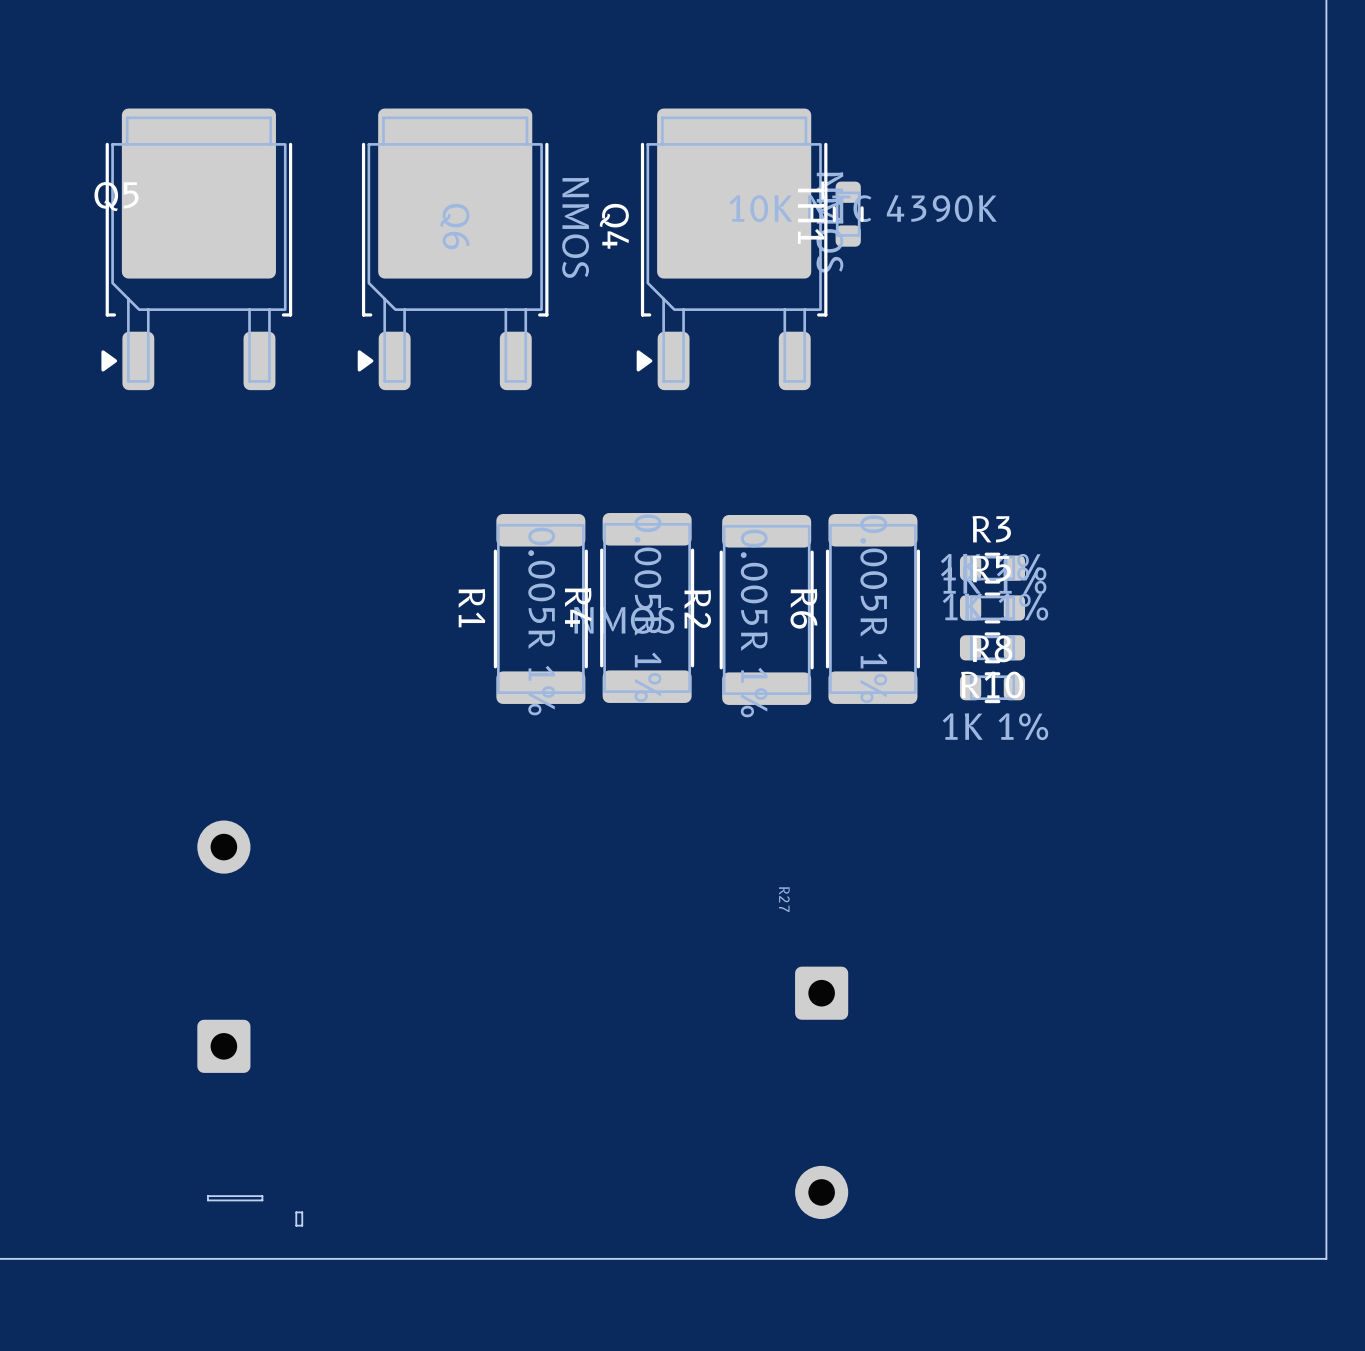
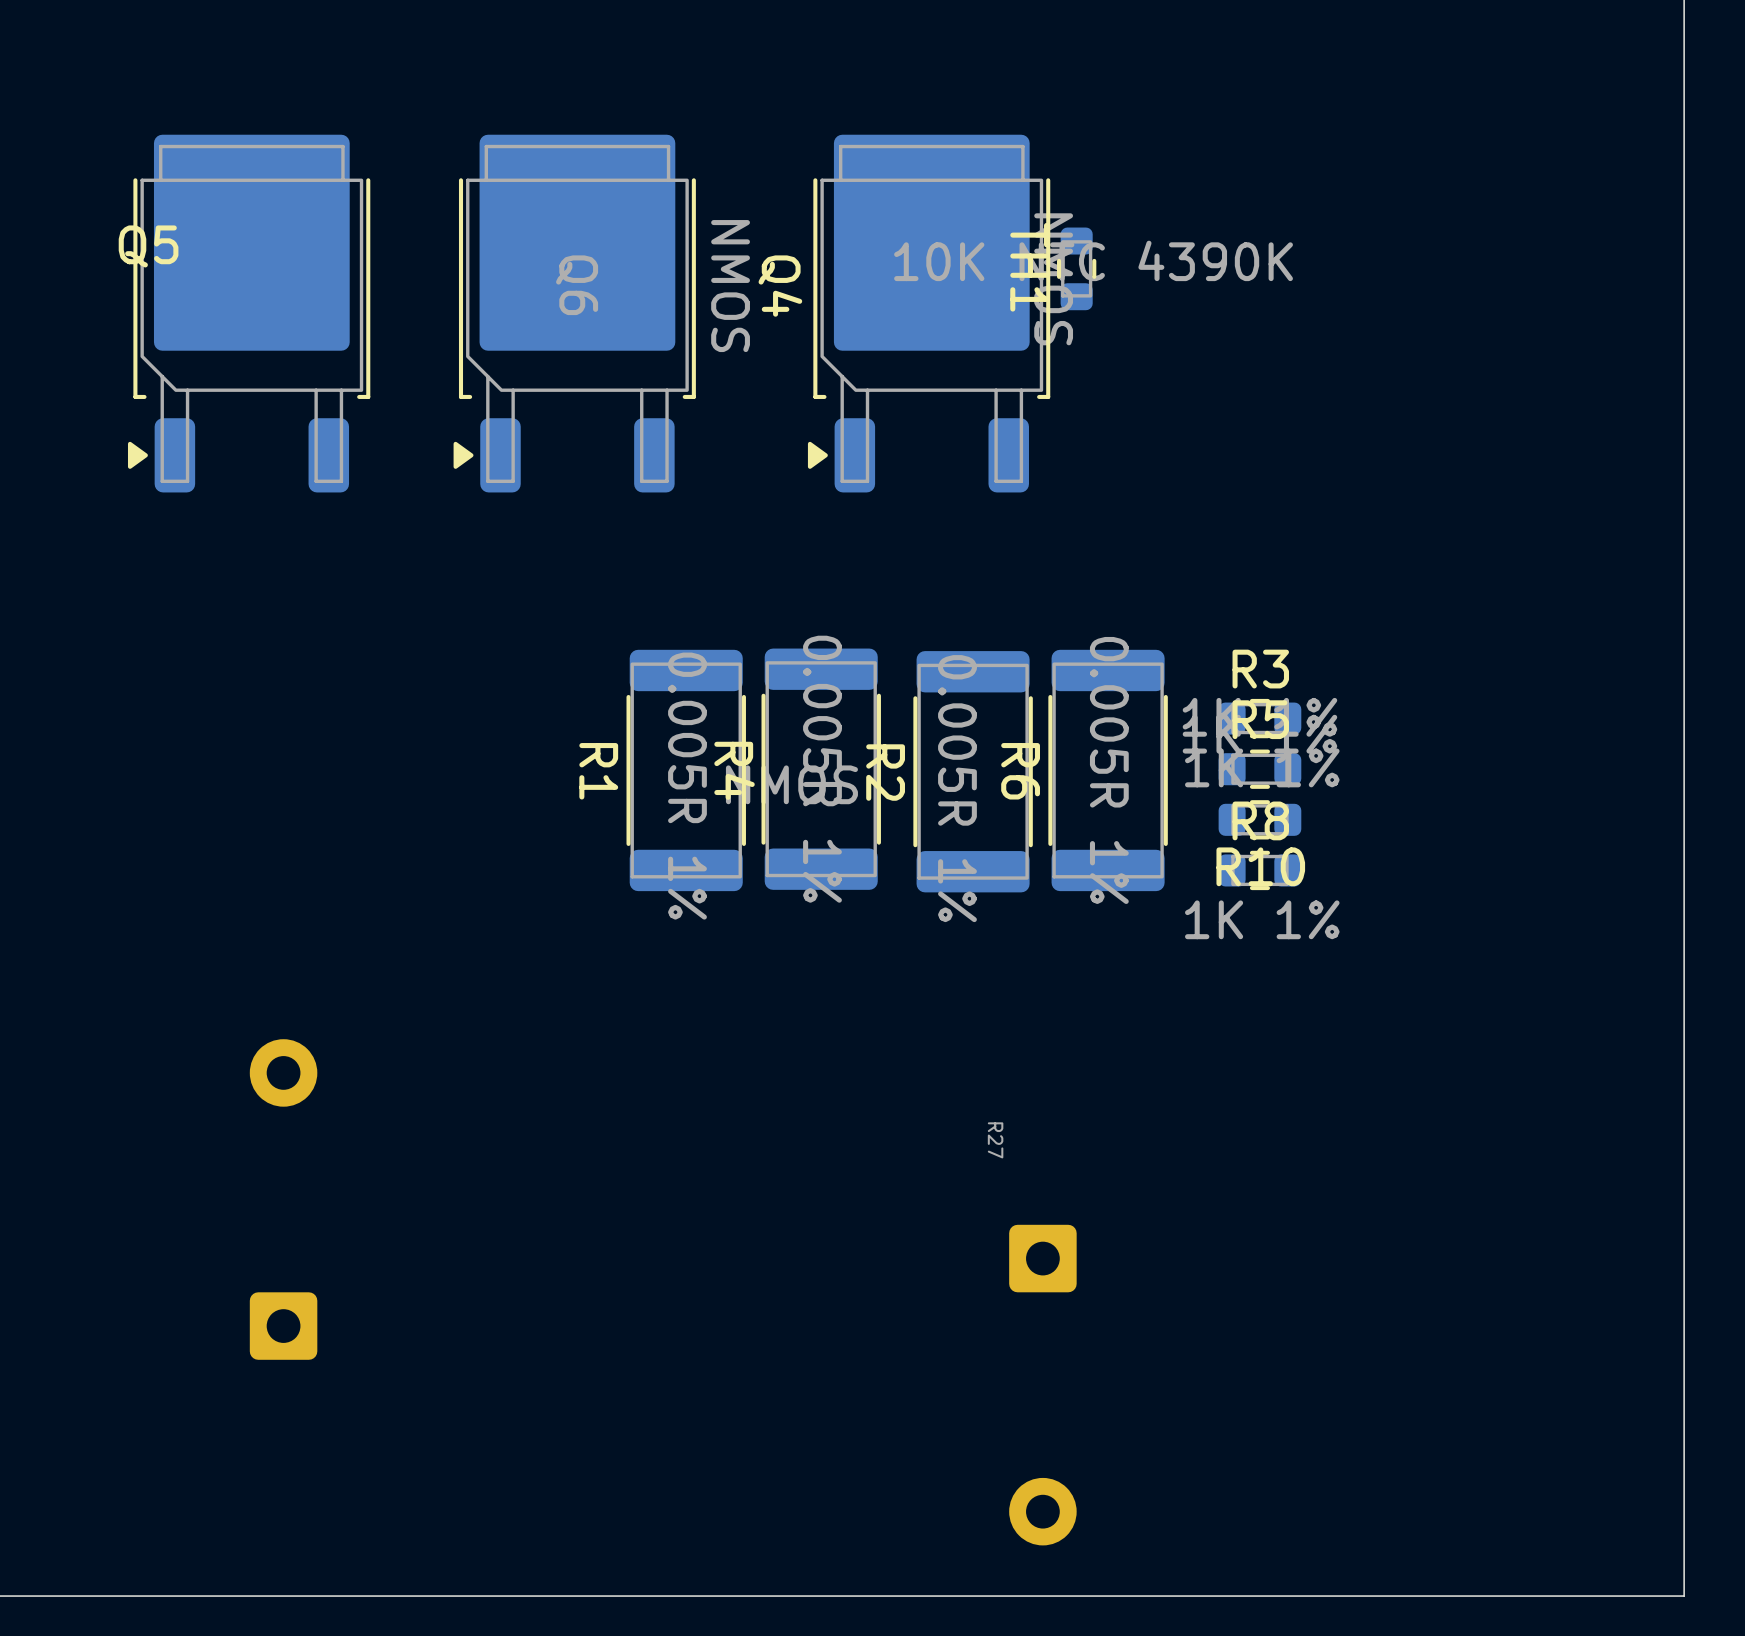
board edge: (262, 1196) (207, 1196) (207, 1200) (262, 1200) (262, 1196) -> none
board edge: (302, 1212) (296, 1212) (296, 1225) (302, 1225) (302, 1212) -> none

